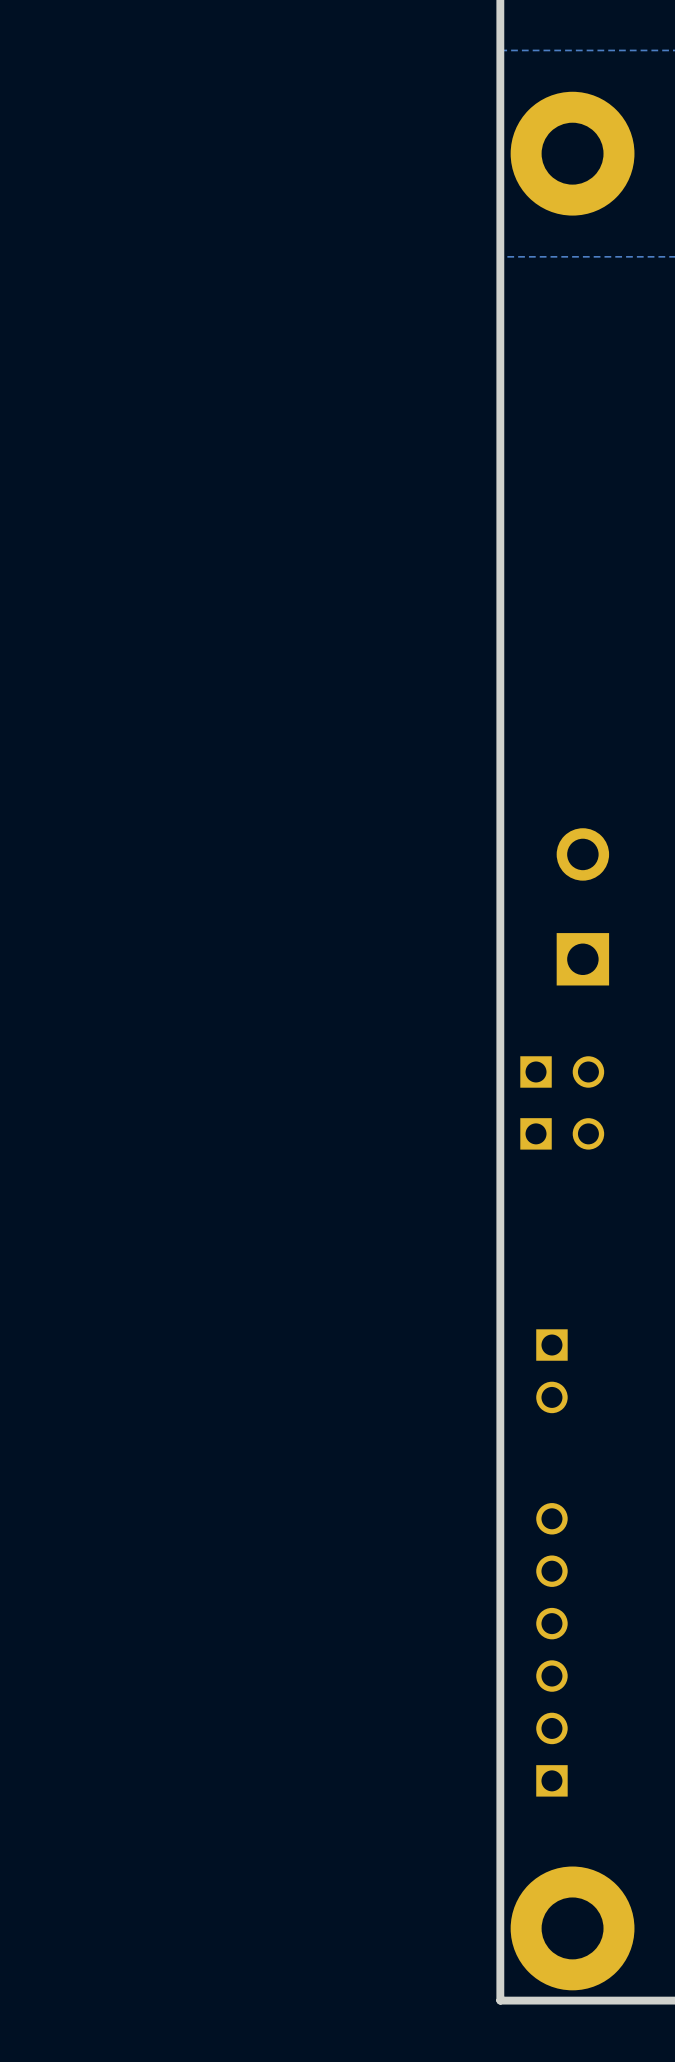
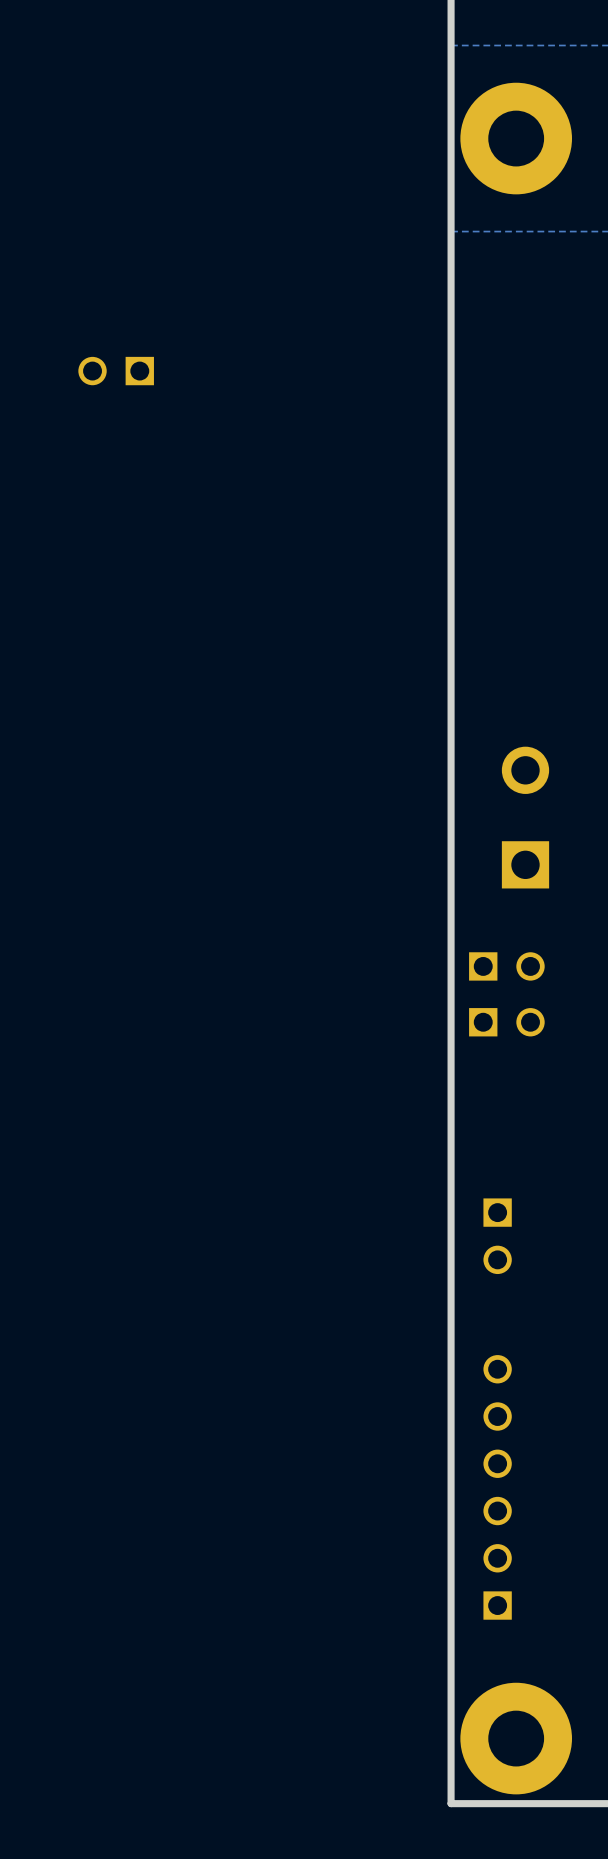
part: none -> (116, 371)

